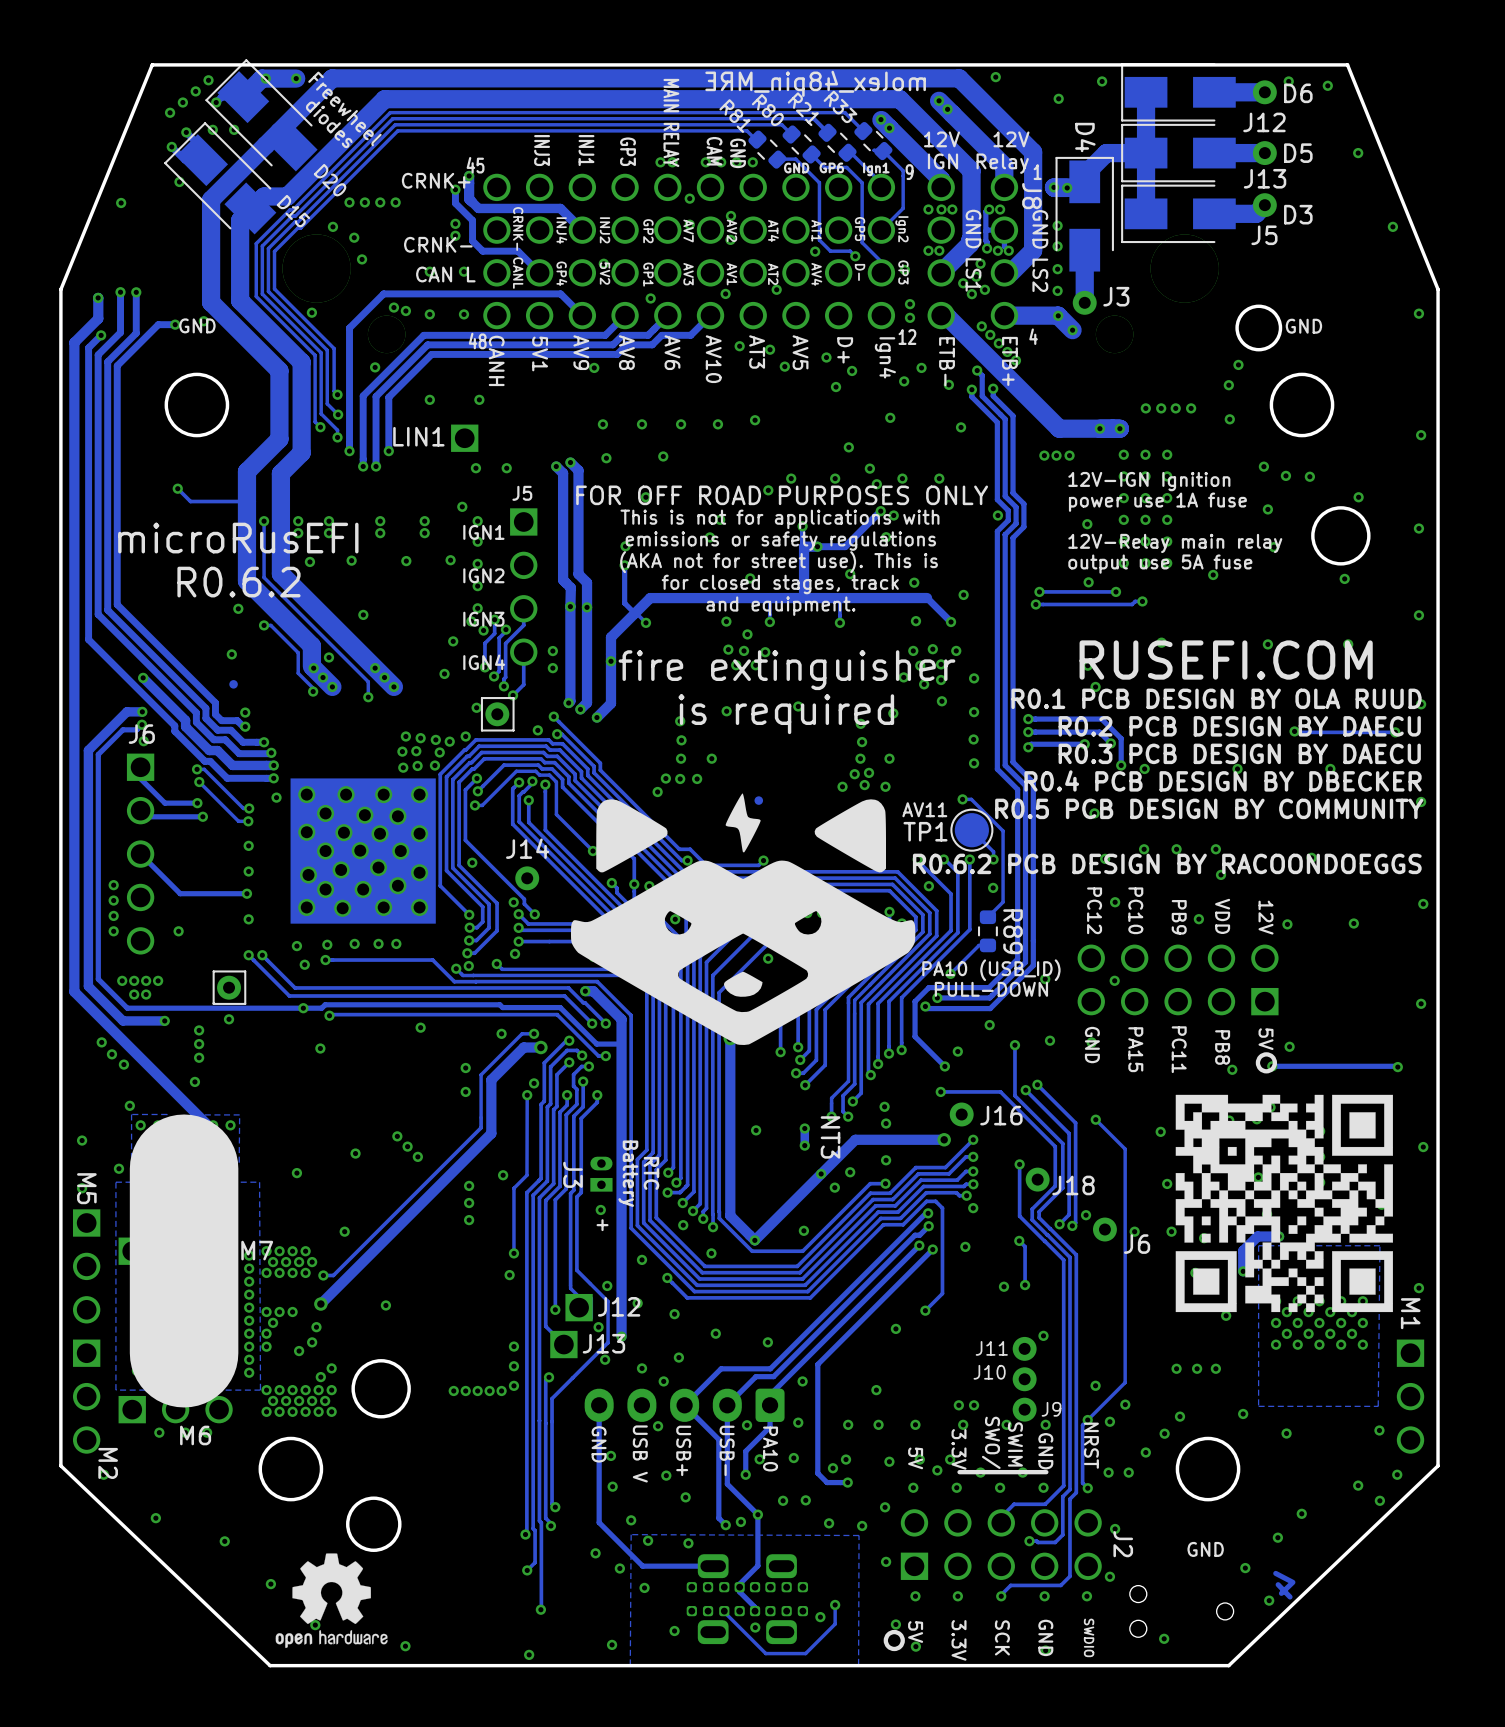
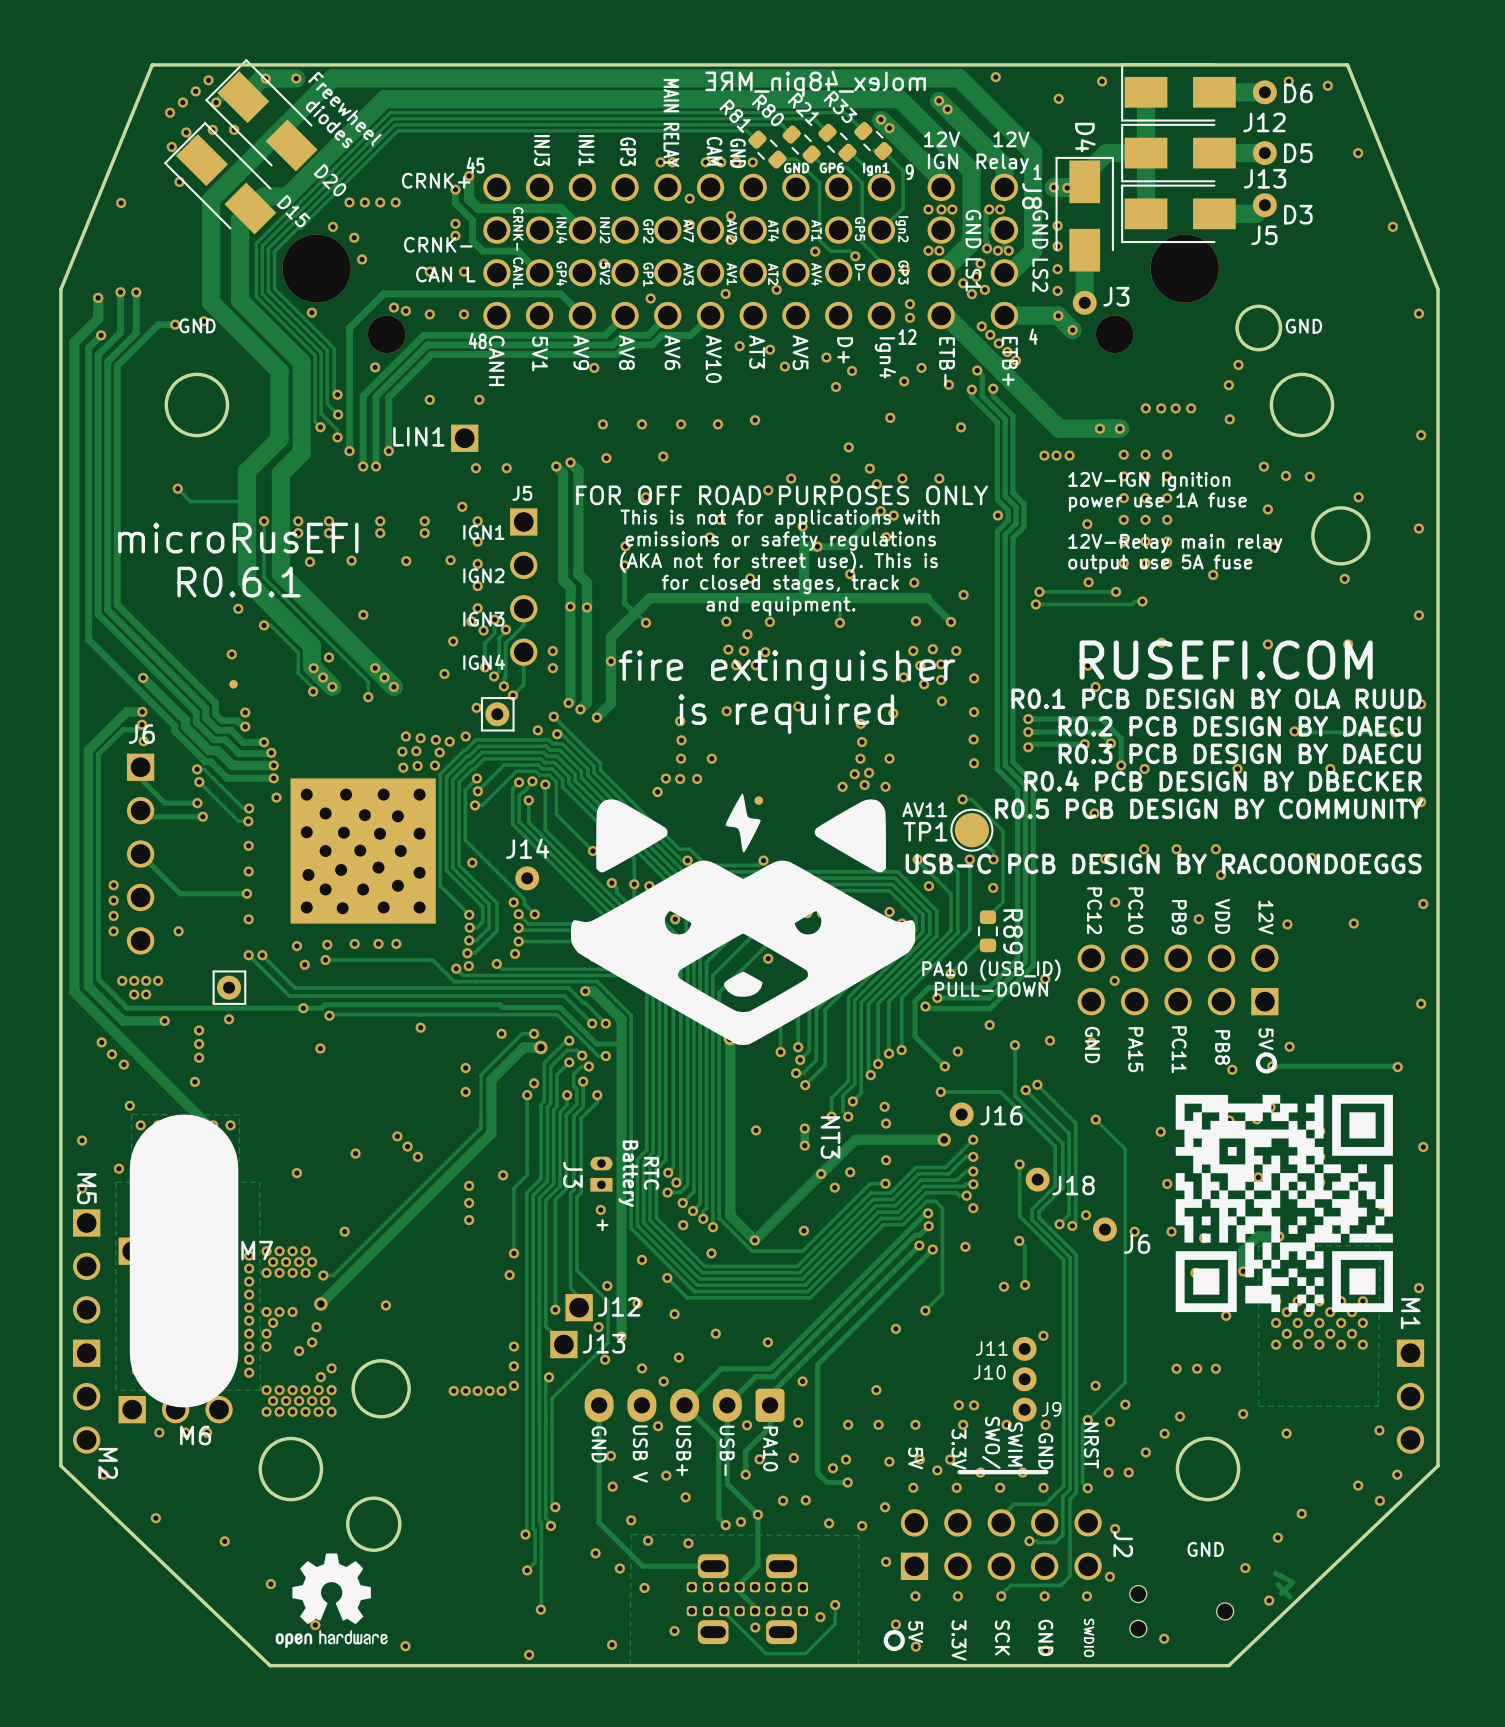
text: R0.6.2 (238, 582) -> R0.6.1 (238, 582)
text: R0.6.2 PCB DESIGN BY RACOONDOEGGS (1167, 863) -> USB-C PCB DESIGN BY RACOONDOEGGS (1163, 863)

